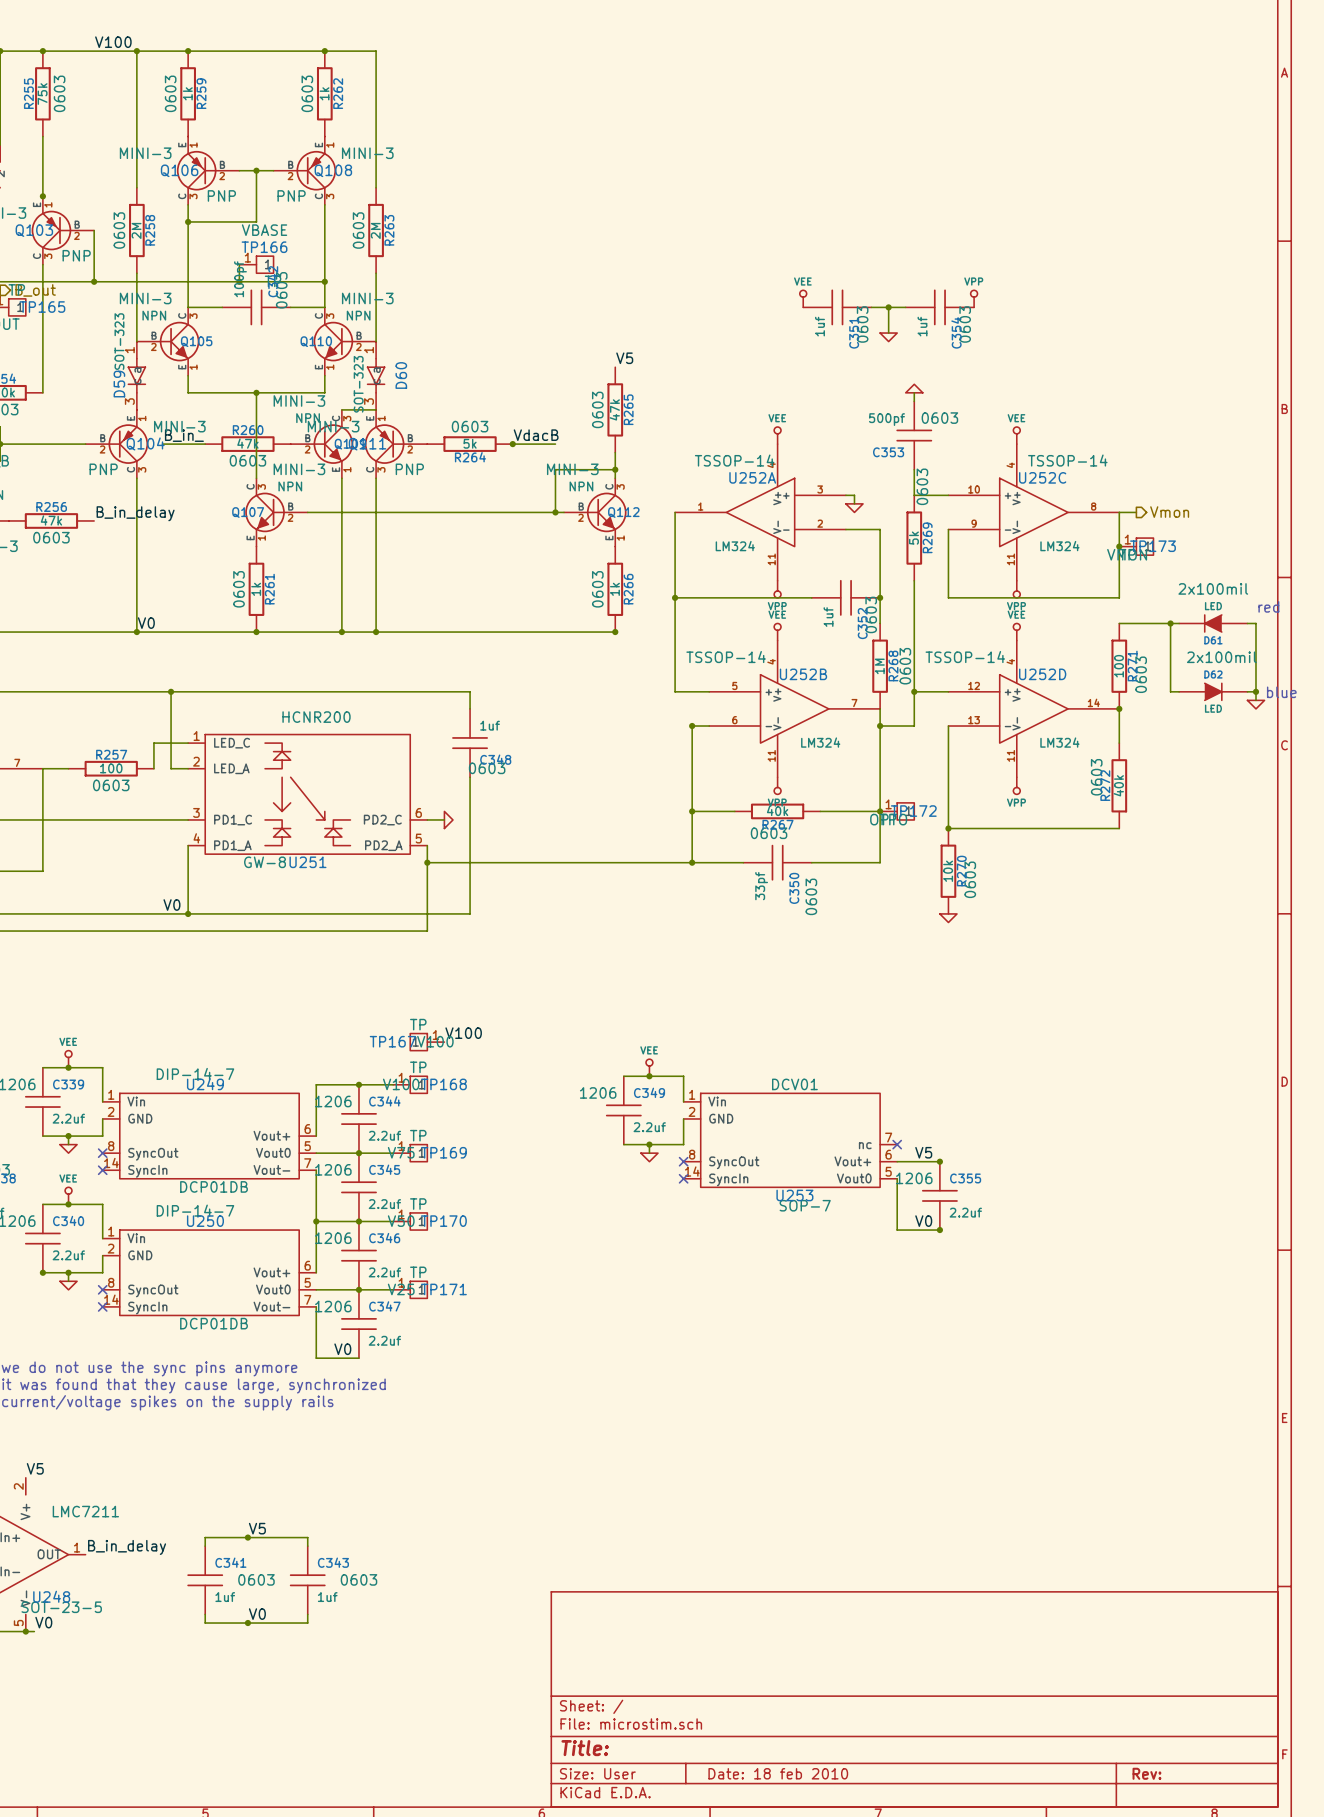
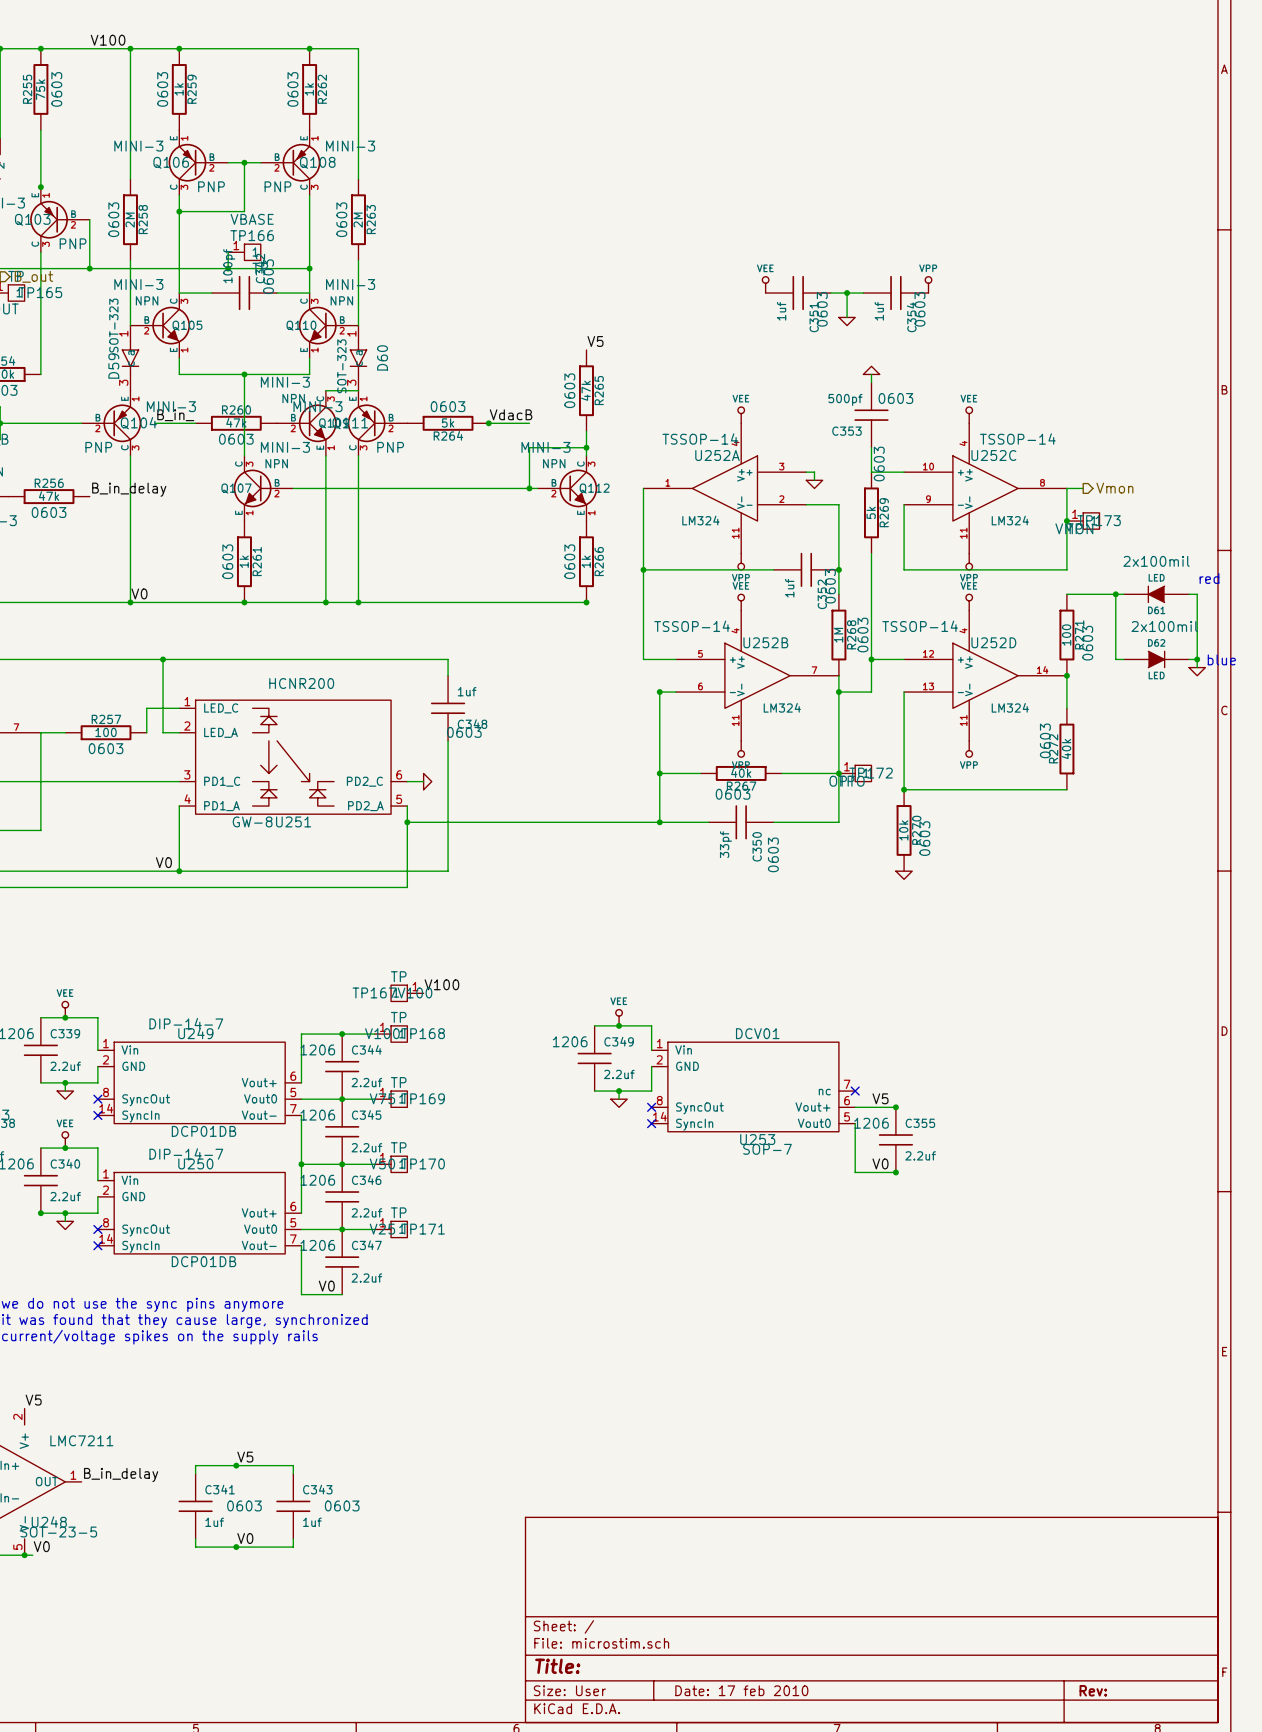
title block: Date: 18 feb 2010 (778, 1773) -> Date: 17 feb 2010 (741, 1690)

